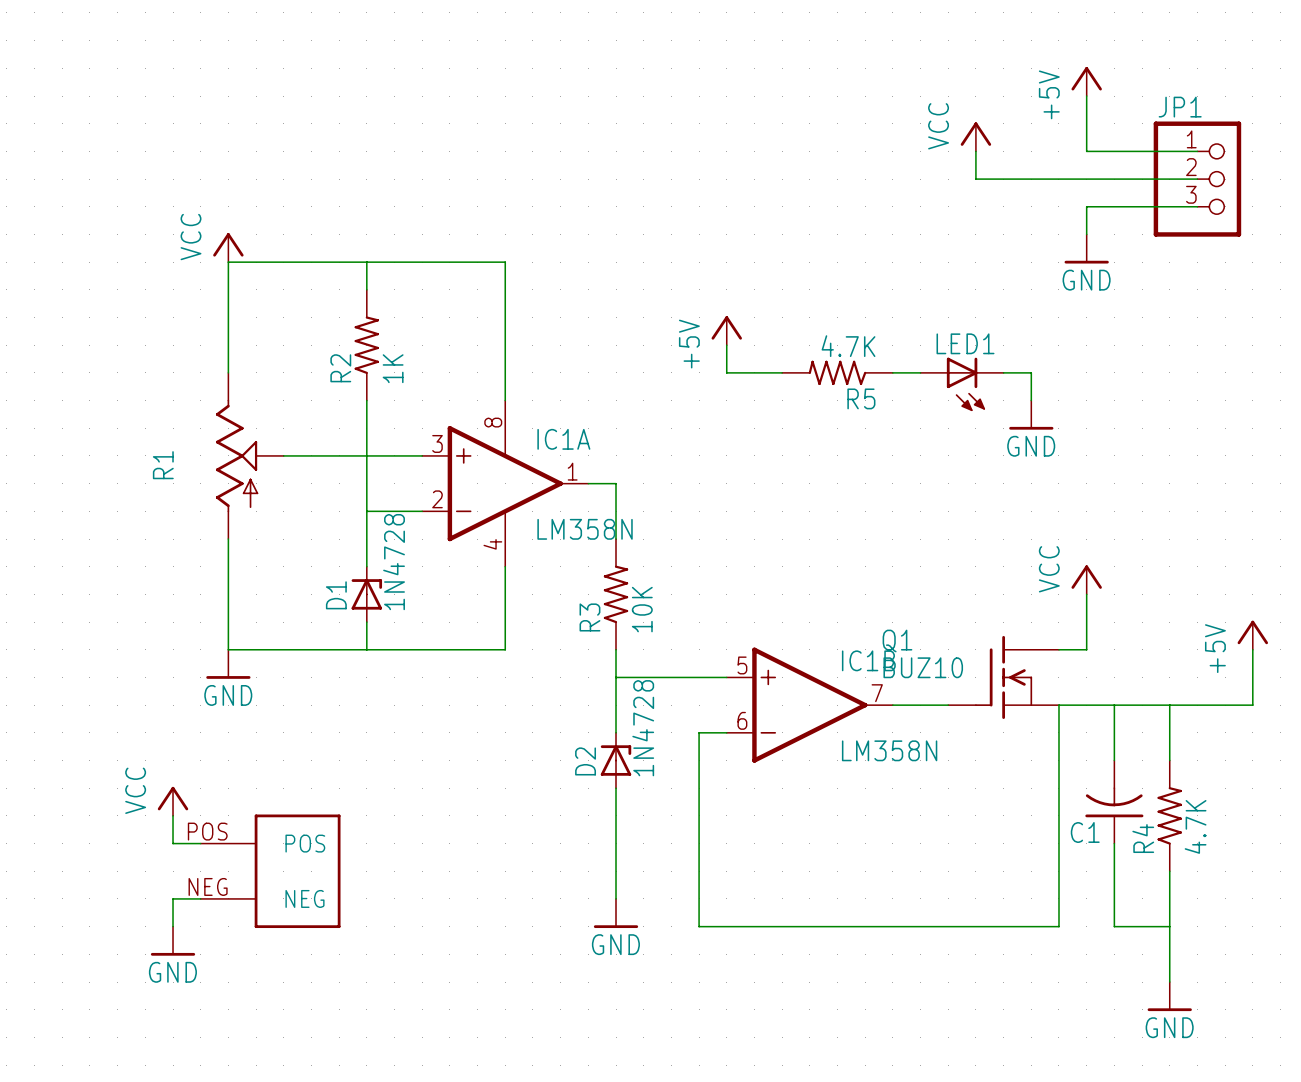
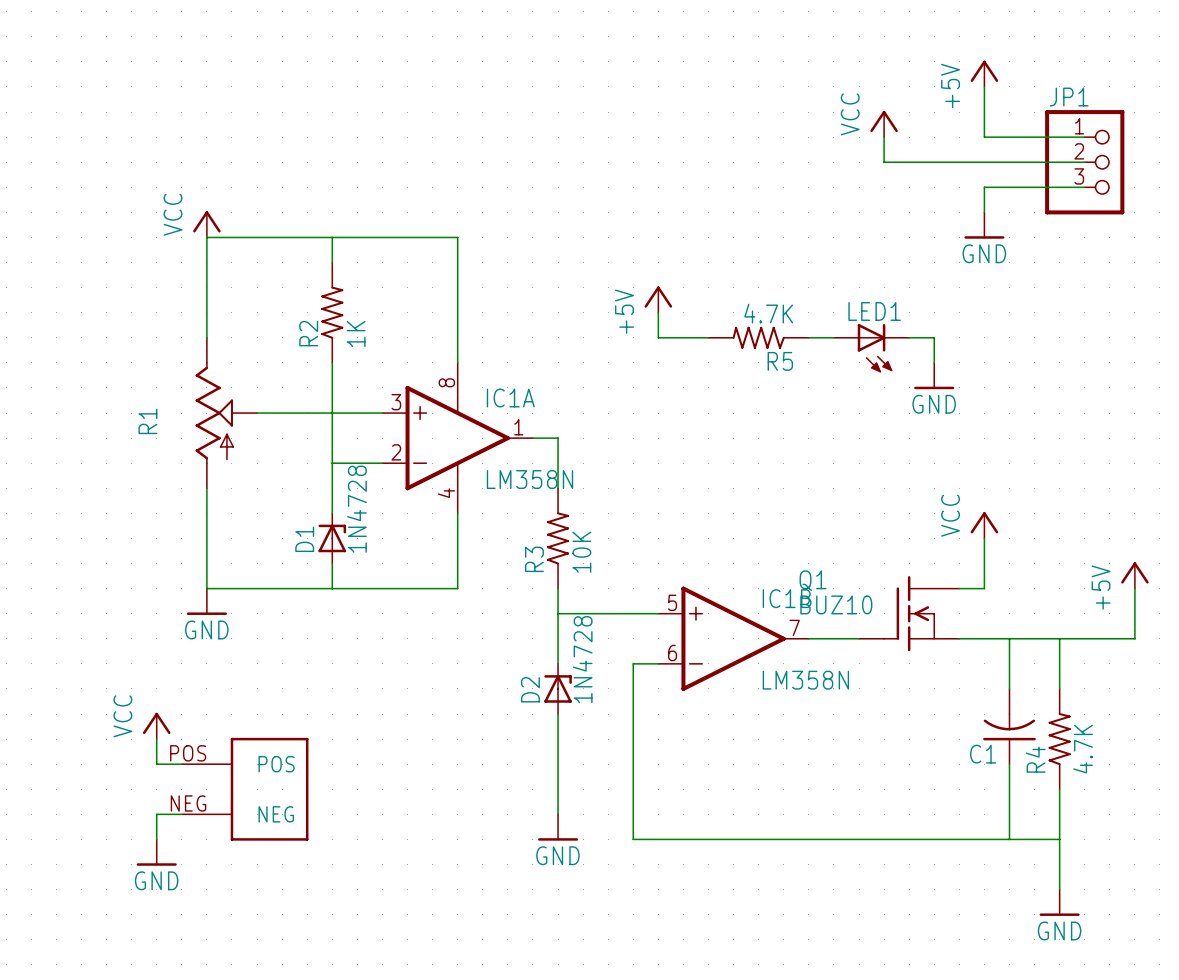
wire: (1058, 705) (1058, 926) -> (1009, 839) (959, 839)

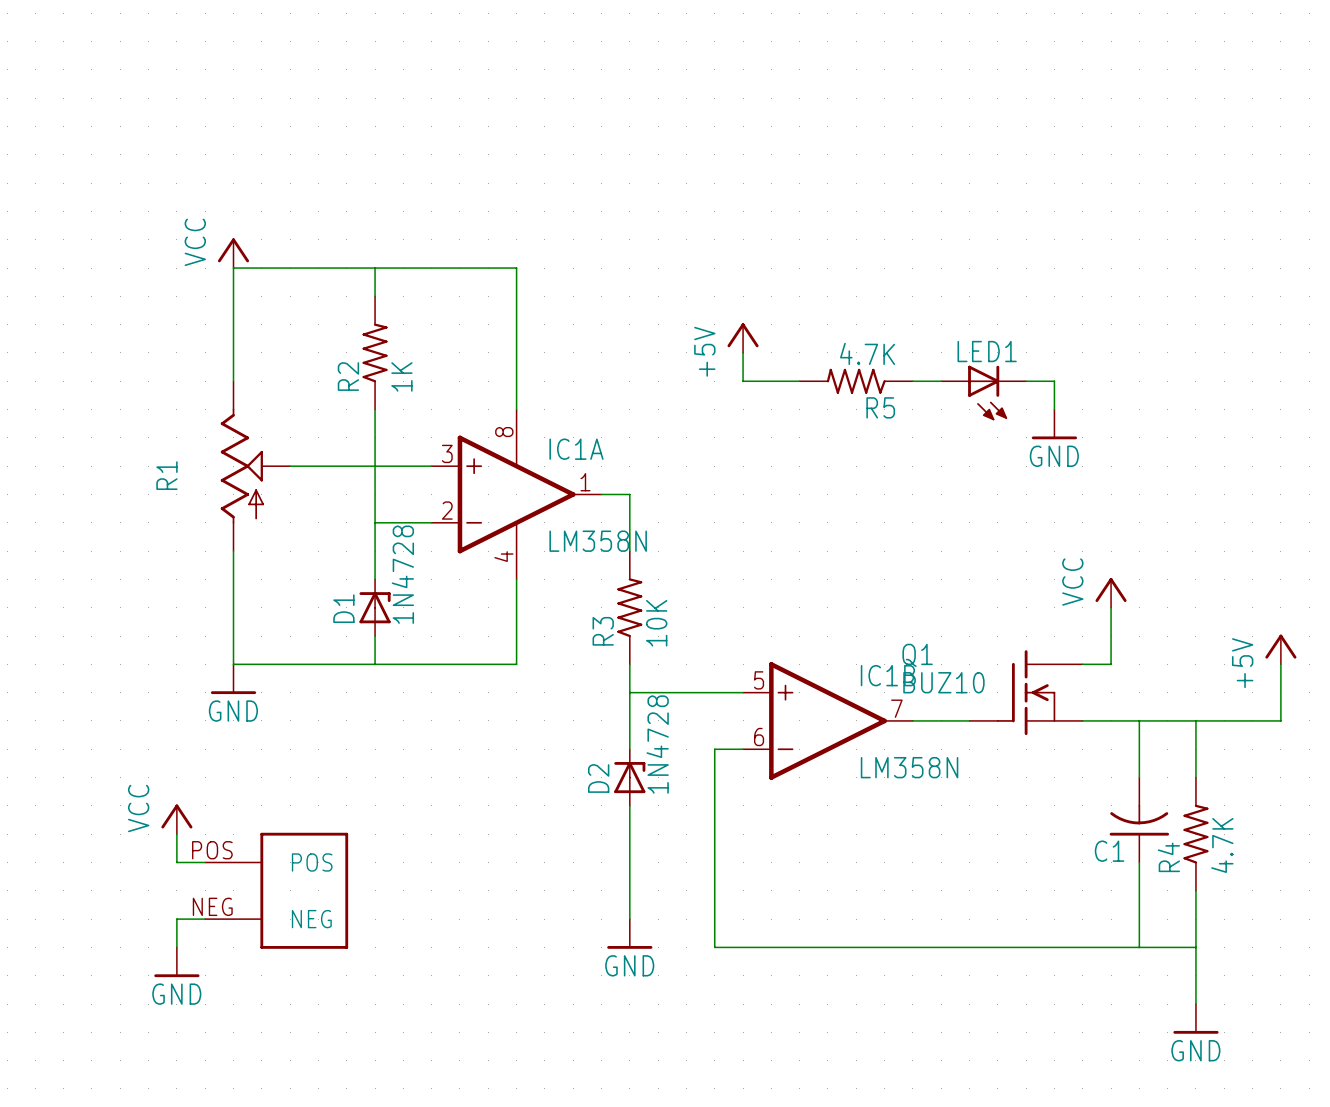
power symbol: +5V (984, 73) -> none
wire: (984, 86) (984, 137) (1084, 137) -> none
power symbol: VCC (884, 123) -> none
wire: (884, 137) (884, 162) (1084, 162) -> none
JP1: (1084, 162) -> none
wire: (1084, 187) (984, 187) (984, 212) -> none
power symbol: GND (984, 225) -> none

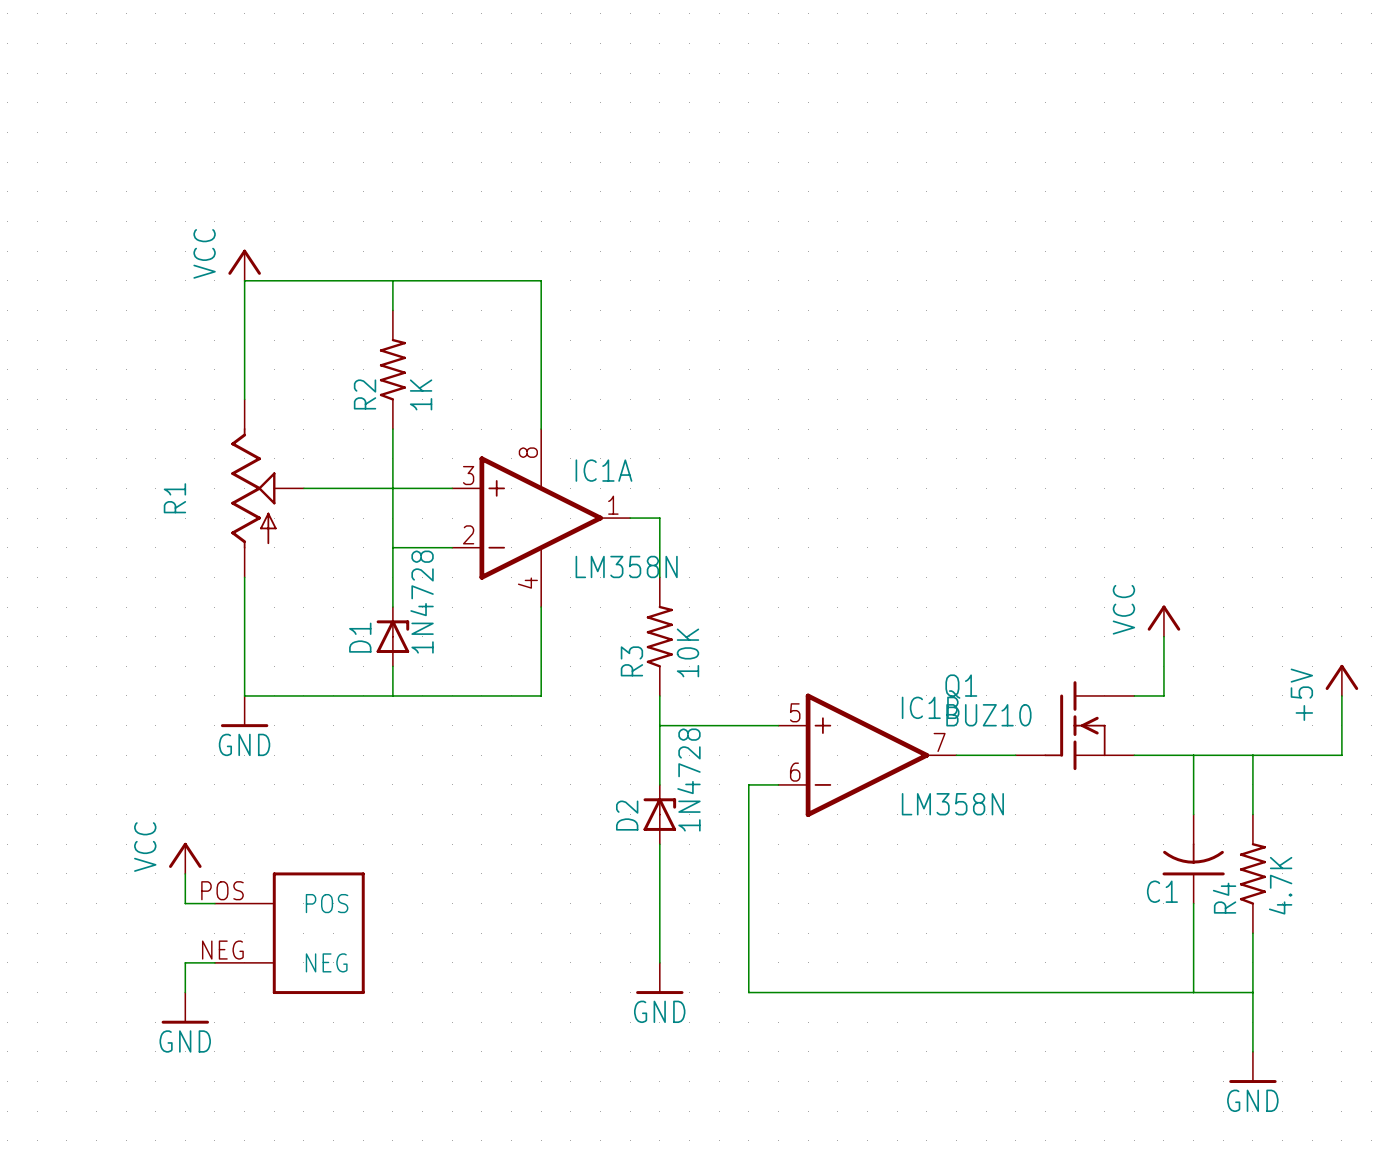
power symbol: +5V (743, 338) -> none
wire: (743, 352) (743, 381) (799, 381) -> none
R5: 4.7K (856, 381) -> none
wire: (912, 381) (941, 381) -> none
wire: (1026, 381) (1054, 381) (1054, 409) -> none
LED1: (983, 393) -> none
power symbol: GND (1054, 424) -> none

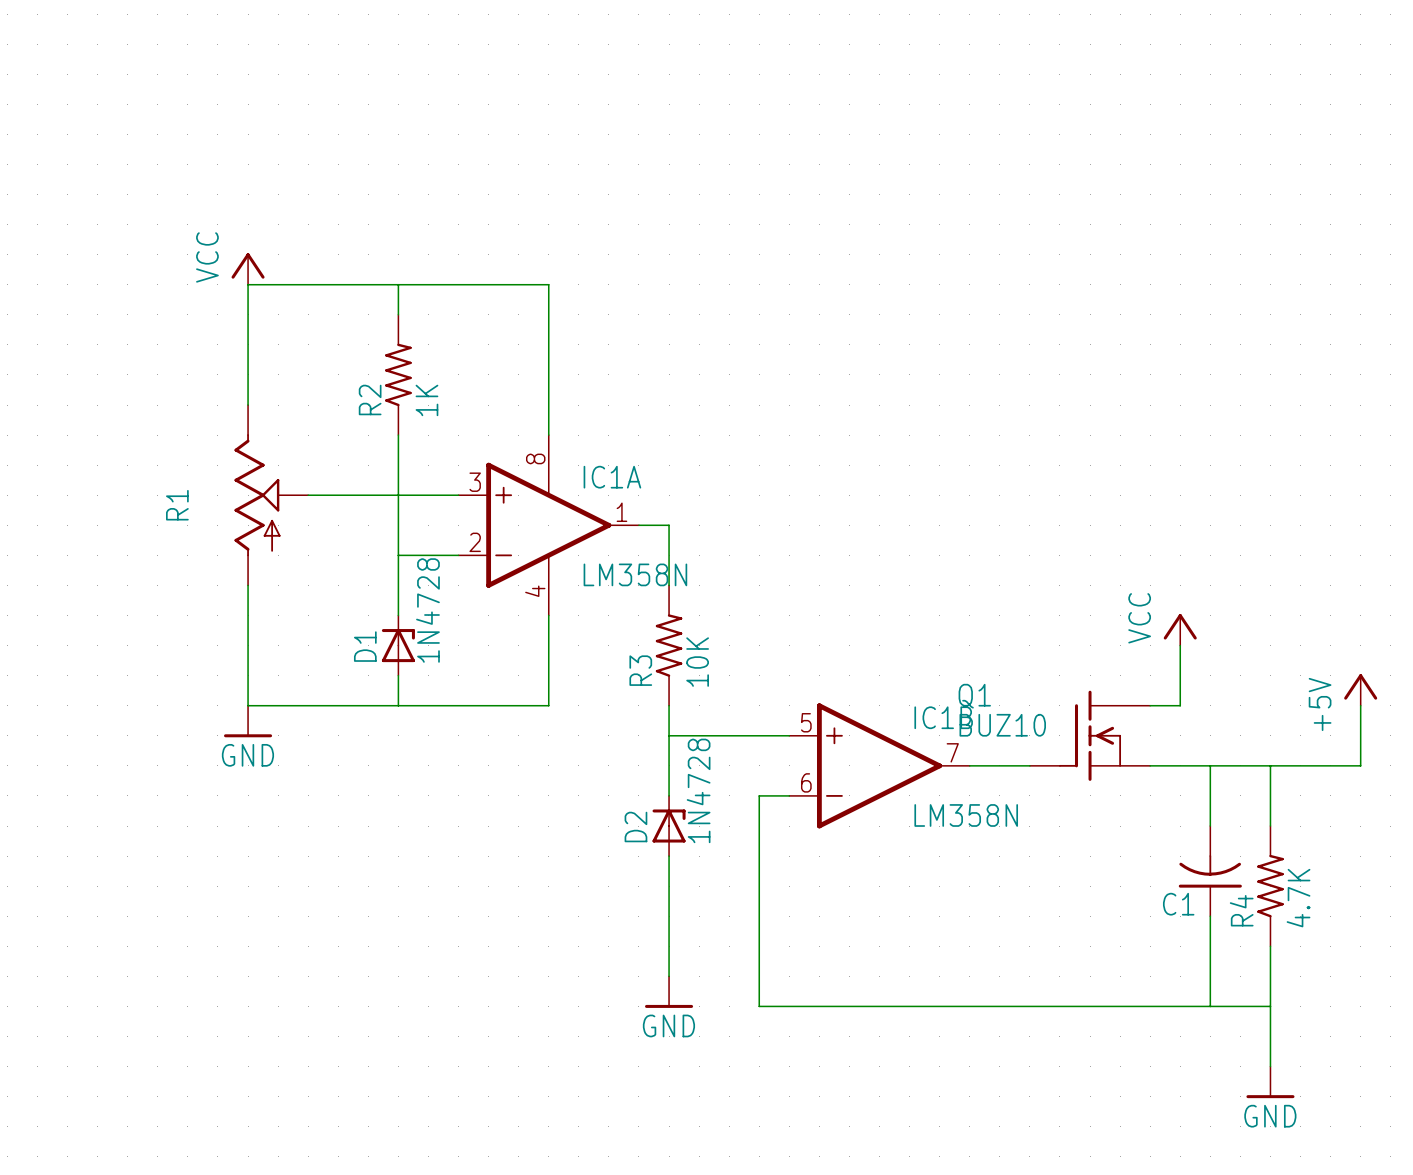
power symbol: VCC (185, 858) -> none
wire: (185, 873) (185, 903) (214, 903) -> none
part: (289, 933) -> none
wire: (214, 962) (185, 962) (185, 992) -> none
power symbol: GND (185, 1008) -> none

